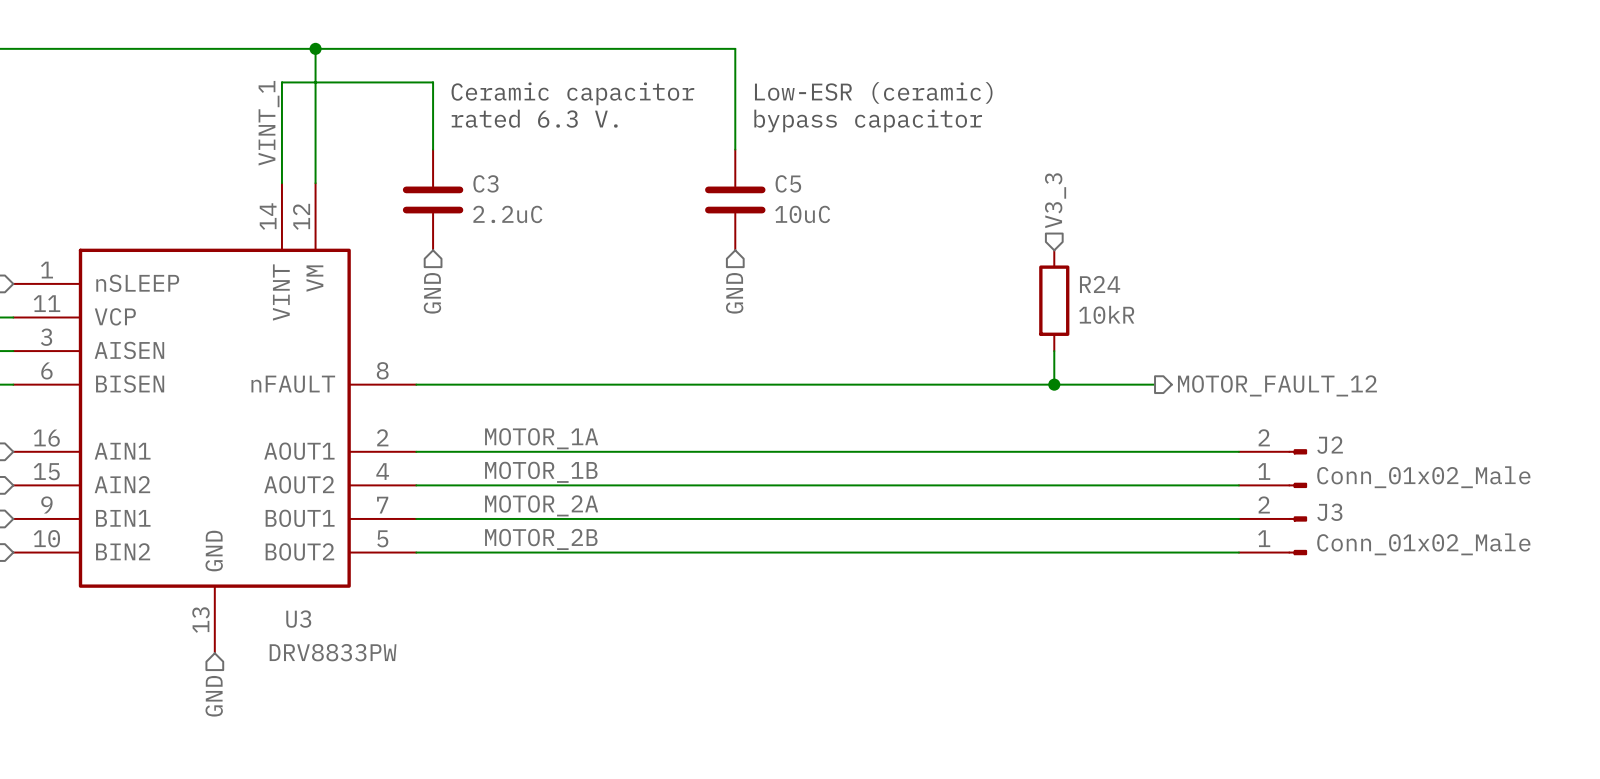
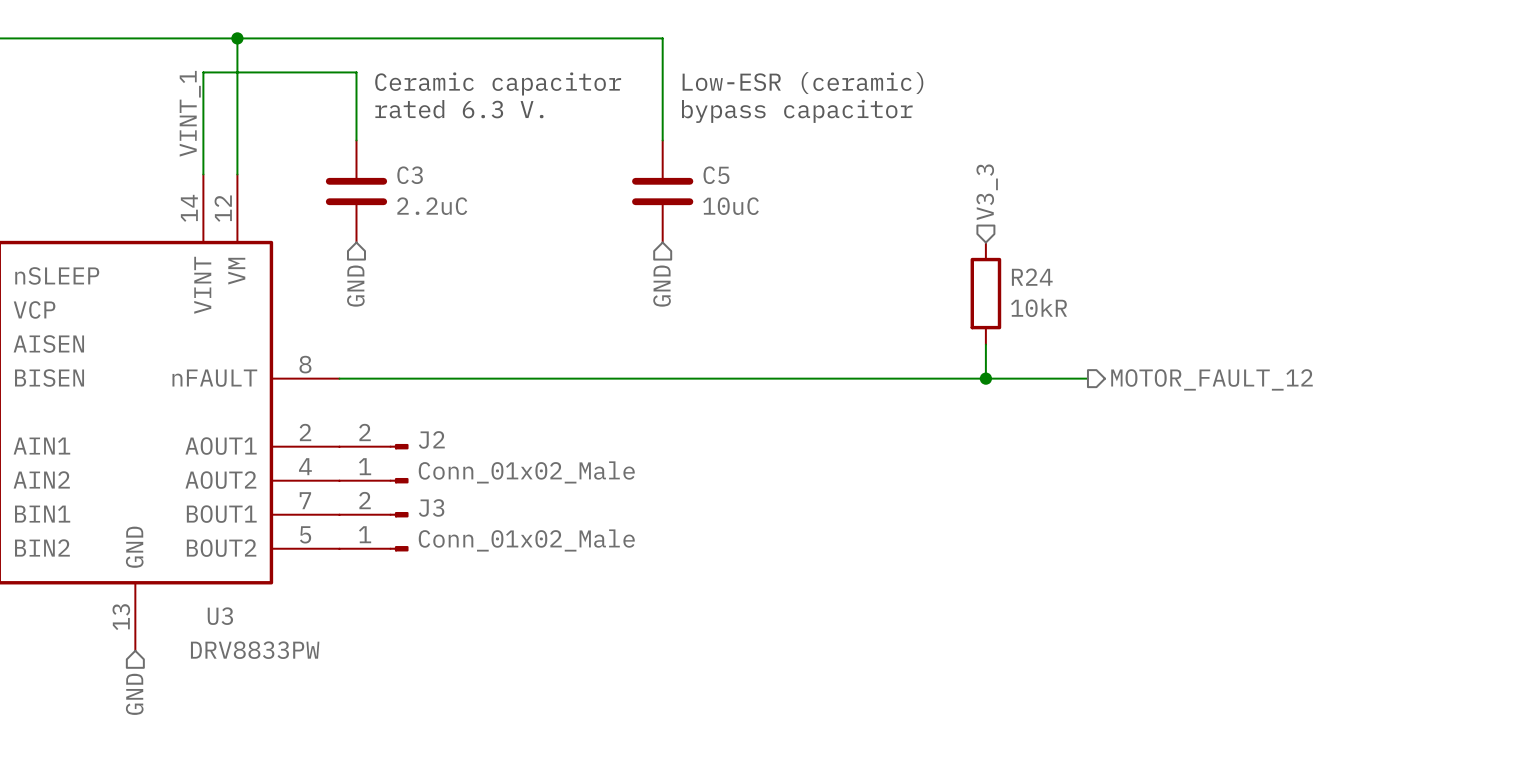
label: MOTOR_1A (541, 438) -> none
wire: (416, 451) (1238, 451) -> none
J2 position: (1273, 468) -> (374, 463)
label: MOTOR_1B (541, 472) -> none
wire: (416, 485) (1238, 485) -> none
label: MOTOR_2A (541, 505) -> none
wire: (416, 518) (1238, 518) -> none
J3 position: (1273, 535) -> (374, 531)
label: MOTOR_2B (541, 539) -> none
wire: (416, 552) (1238, 552) -> none

